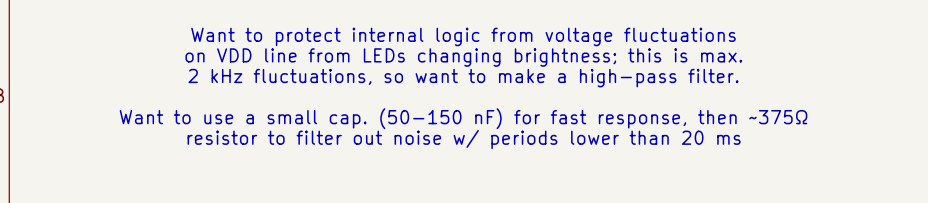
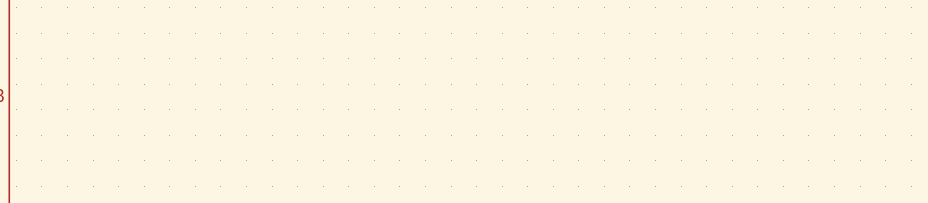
text: Want to protect internal logic from voltage fluctuations (463, 36) -> none
text: on VDD line from LEDs changing brightness; this is max. (463, 57) -> none
text: 2 kHz fluctuations, so want to make a high-pass filter. (463, 78) -> none
text: Want to use a small cap. (50-150 nF) for fast response, then ~375Ω (463, 118) -> none
text: resistor to filter out noise w/ periods lower than 20 ms (464, 139) -> none

